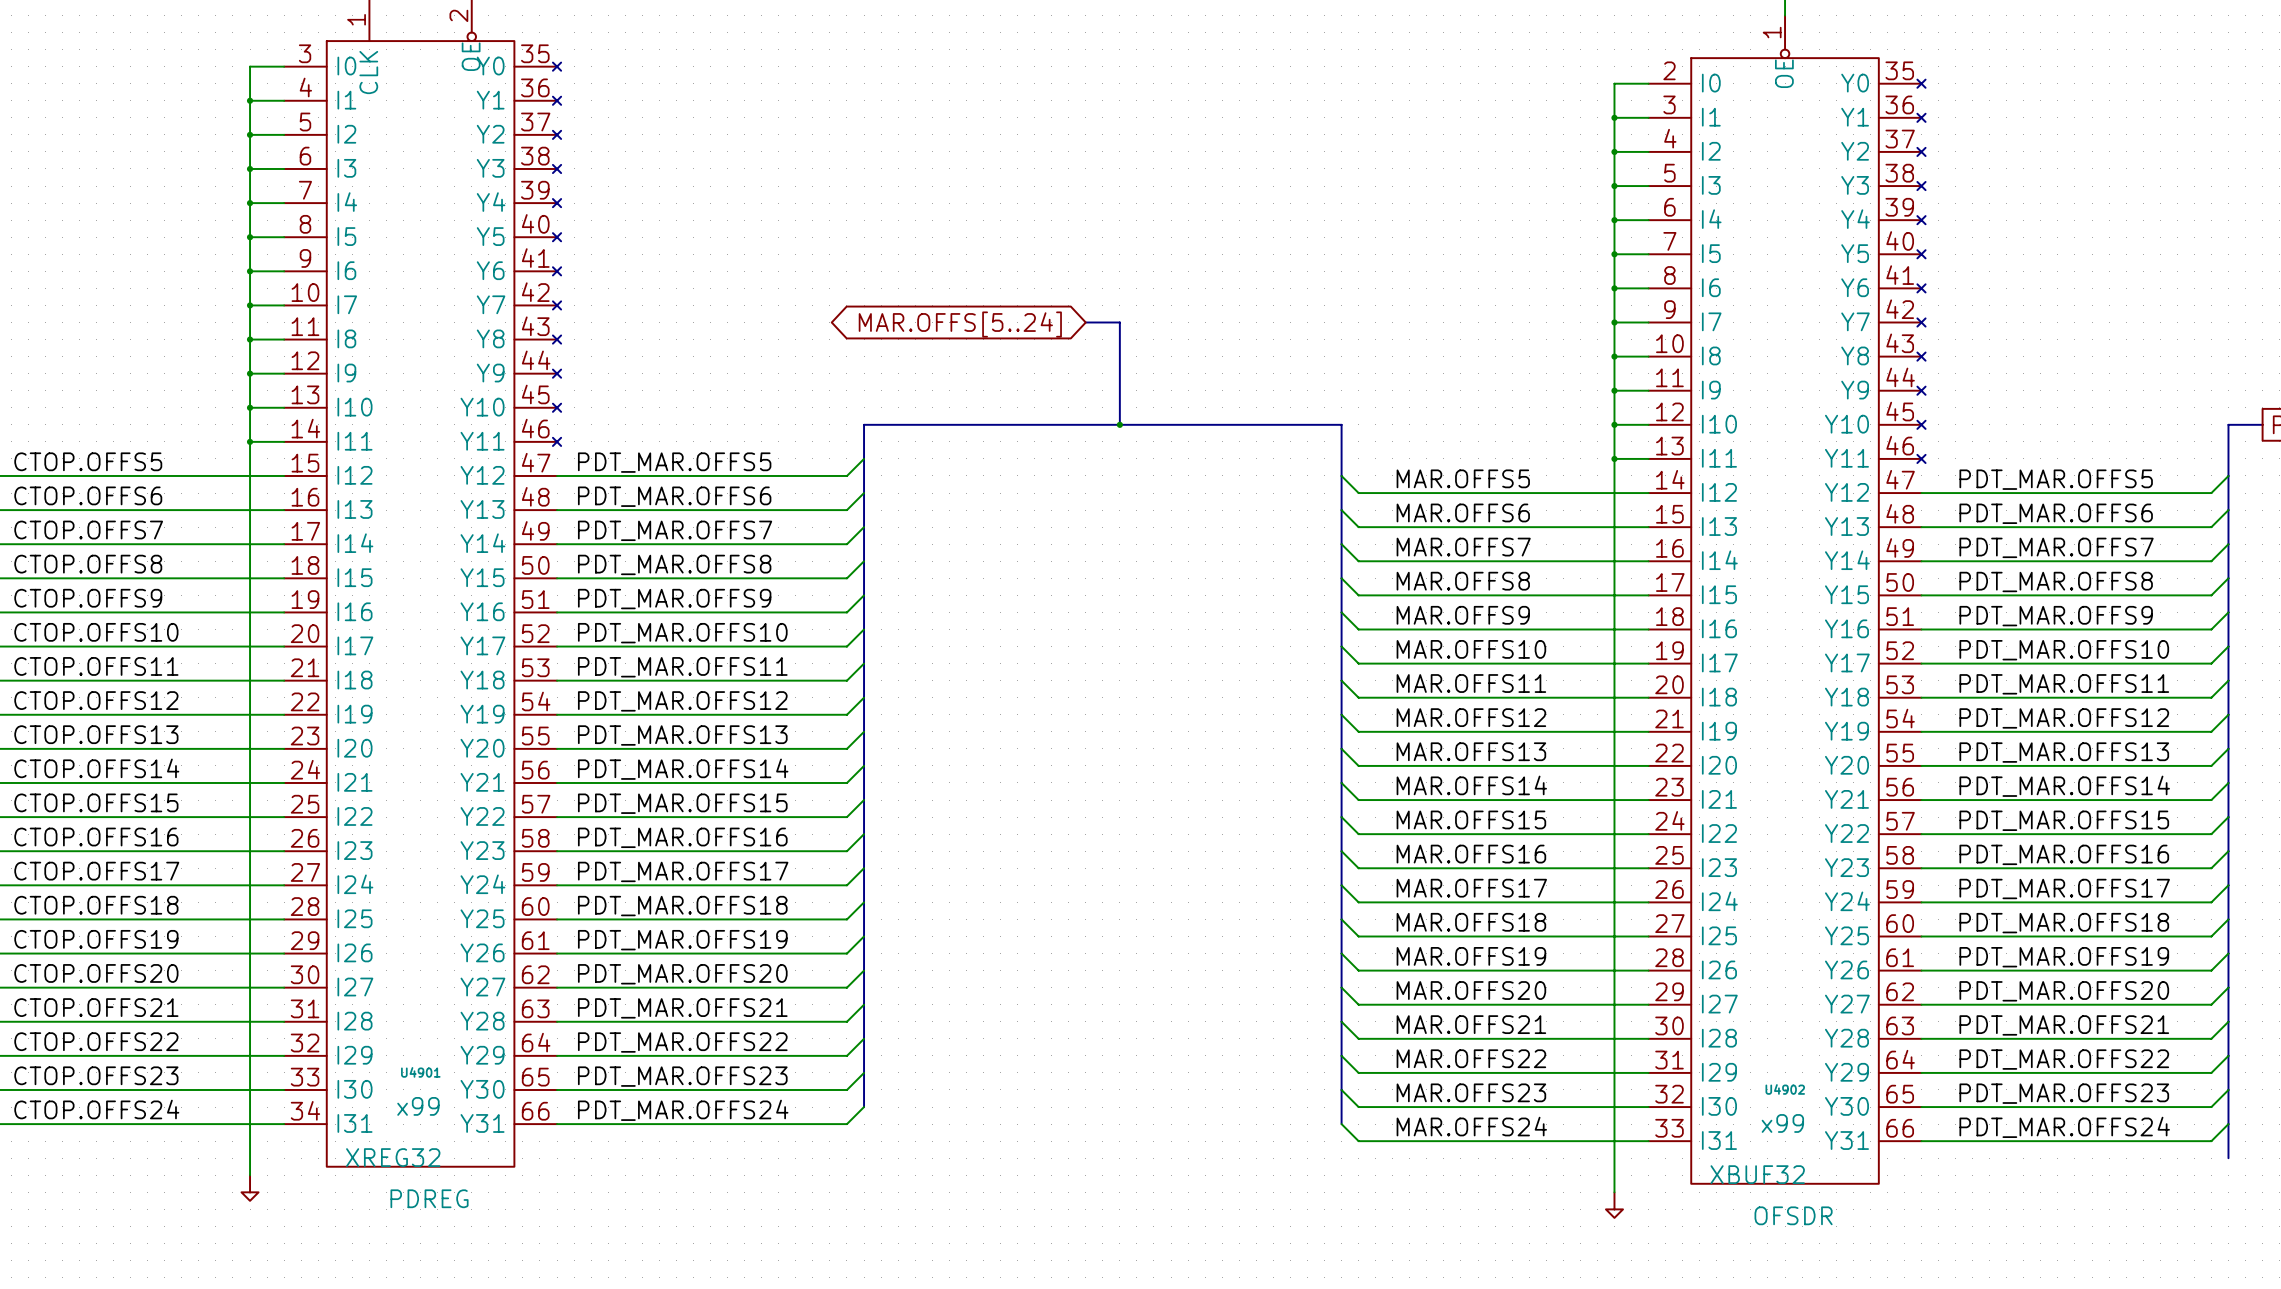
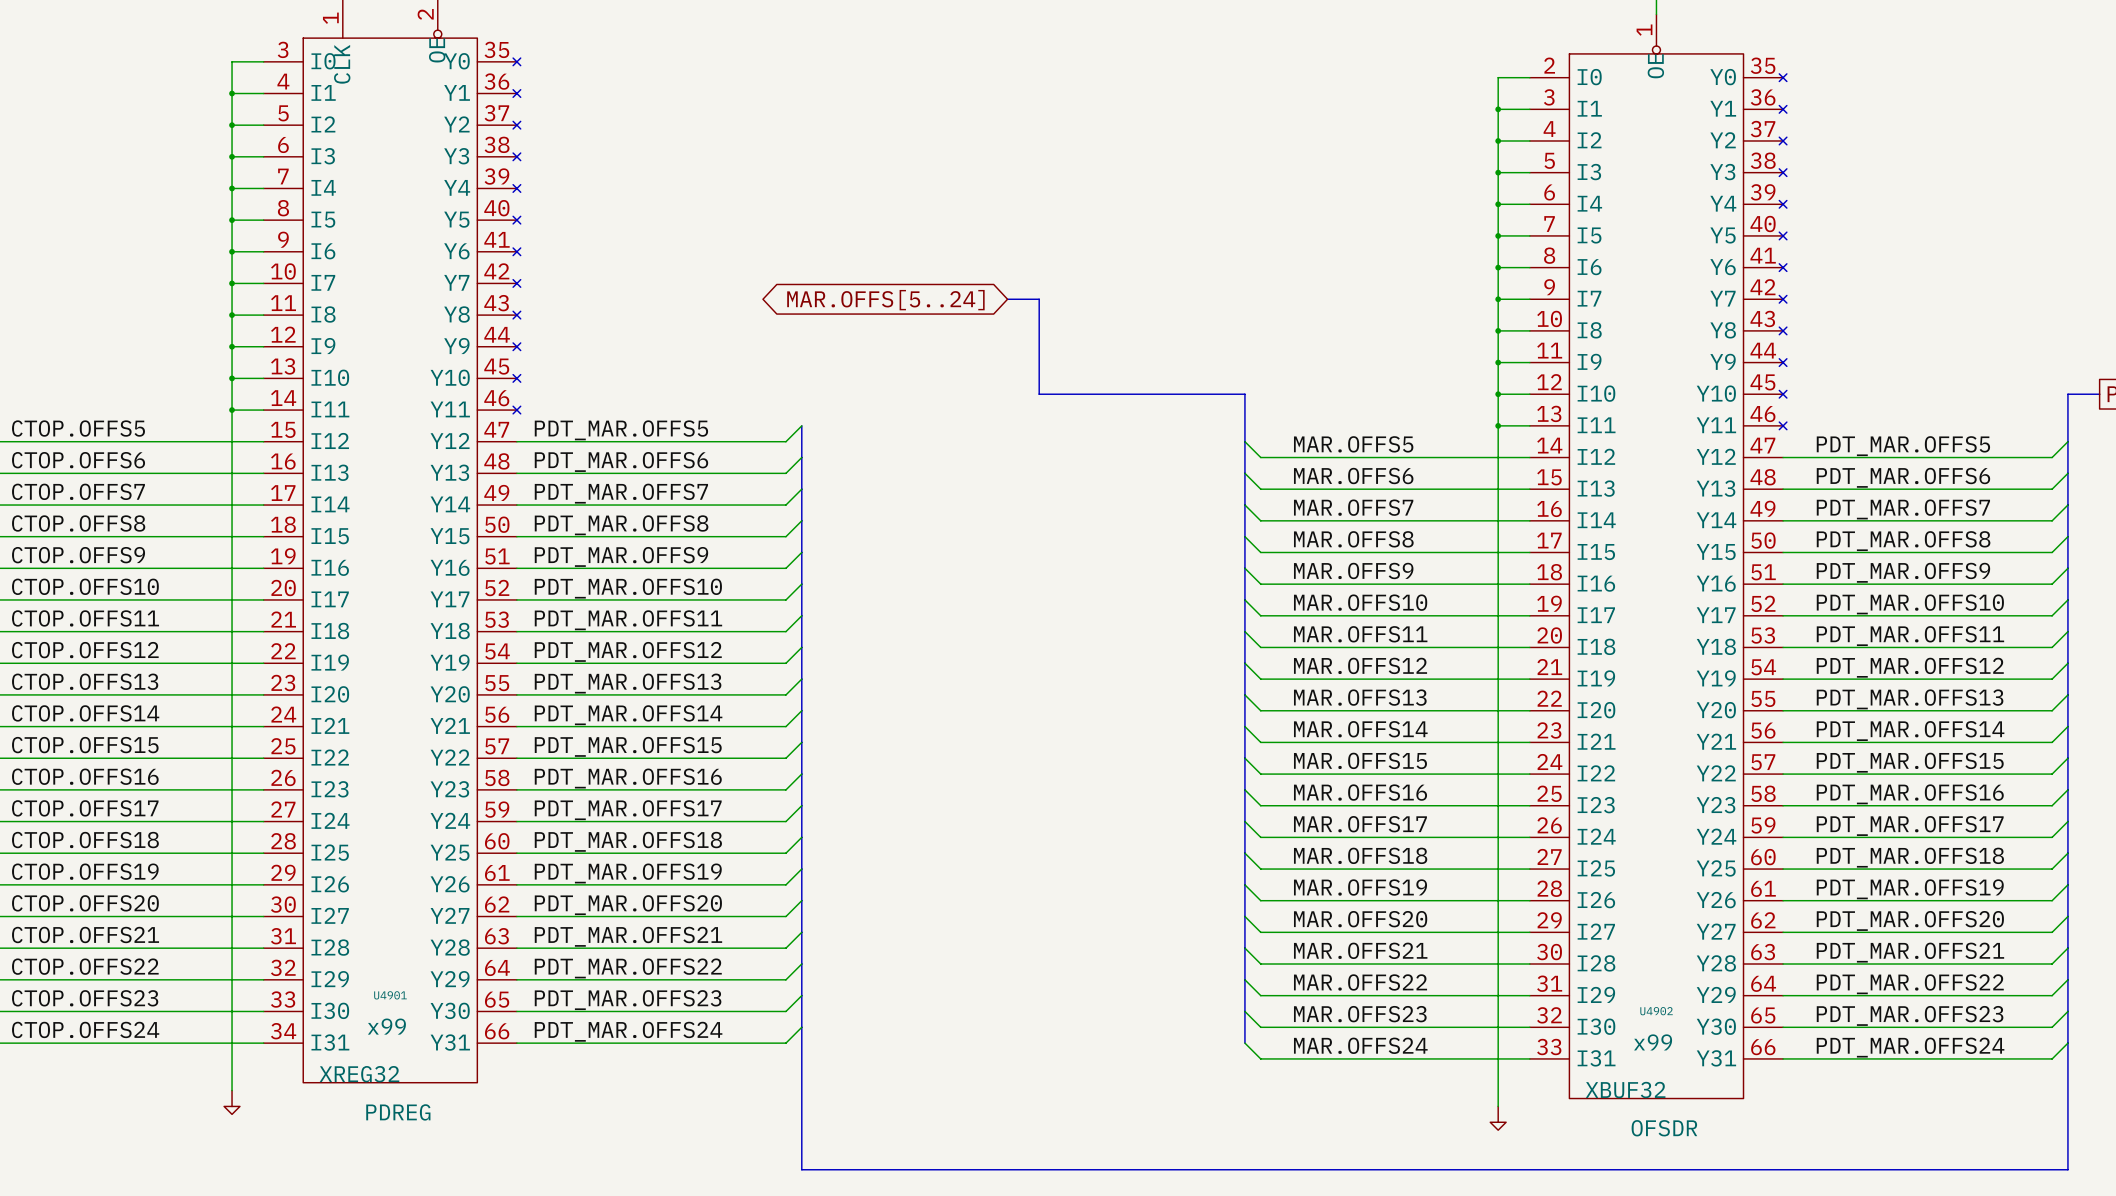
bus: (1119, 424) (864, 424) (864, 458) -> none
junction: (1119, 424) -> none
bus: none -> (801, 1027) (801, 1169) (2067, 1169) (2067, 1074)

